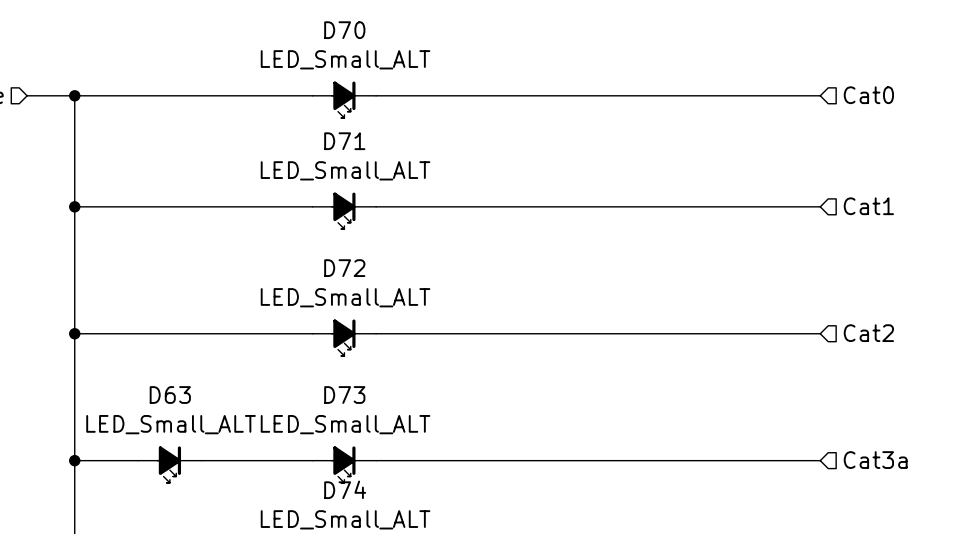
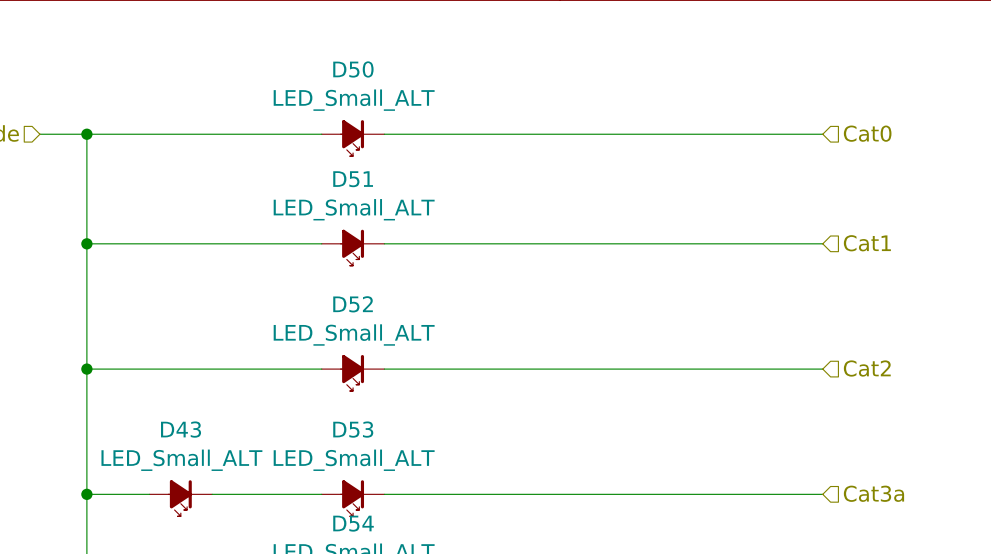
D70 name: D70 (344, 30) -> D50 (353, 69)
D71 name: D71 (344, 141) -> D51 (353, 179)
D72 name: D72 (344, 268) -> D52 (353, 304)
D63 name: D63 (170, 395) -> D43 (181, 429)
D73 name: D73 (344, 395) -> D53 (353, 429)
D74 name: D74 (345, 489) -> D54 (353, 523)

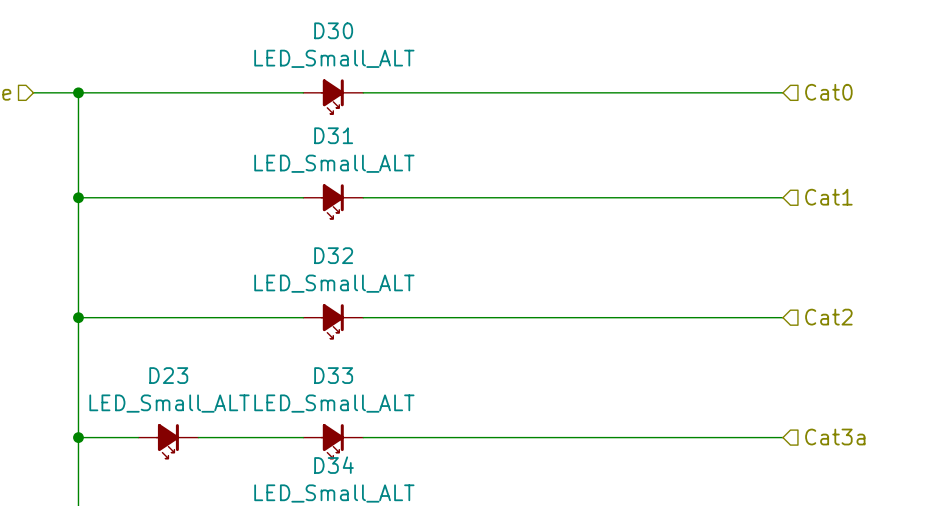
D50 name: D50 (353, 69) -> D30 (333, 30)
D51 name: D51 (353, 179) -> D31 (333, 135)
D52 name: D52 (353, 304) -> D32 (333, 255)
D43 name: D43 (181, 429) -> D23 (168, 375)
D53 name: D53 (353, 429) -> D33 (333, 375)
D54 name: D54 (353, 523) -> D34 (334, 465)

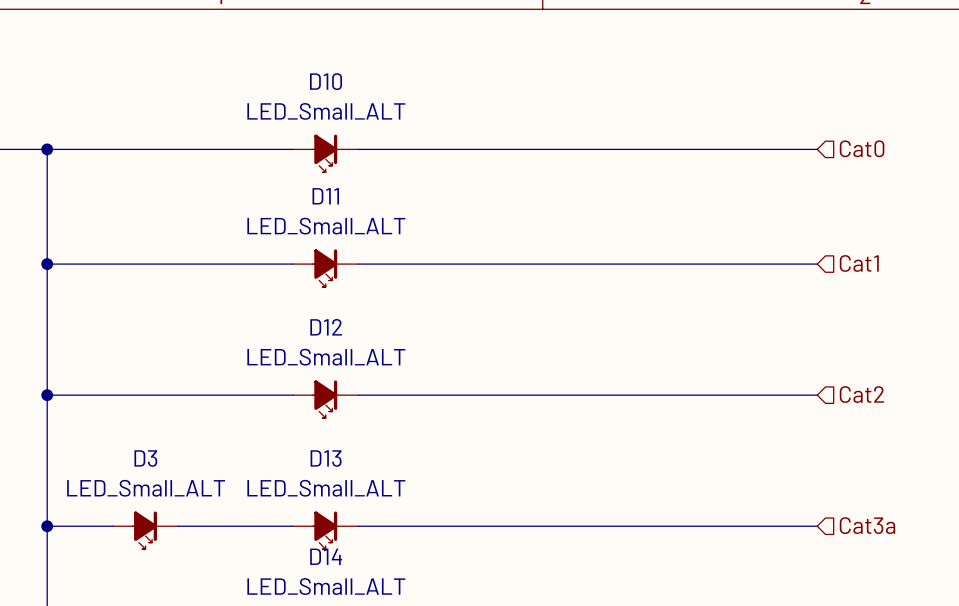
D30 name: D30 (333, 30) -> D10 (326, 81)
D31 name: D31 (333, 135) -> D11 (325, 196)
D32 name: D32 (333, 255) -> D12 (326, 327)
D23 name: D23 (168, 375) -> D3 (145, 458)
D33 name: D33 (333, 375) -> D13 (326, 458)
D34 name: D34 (334, 465) -> D14 (326, 556)

